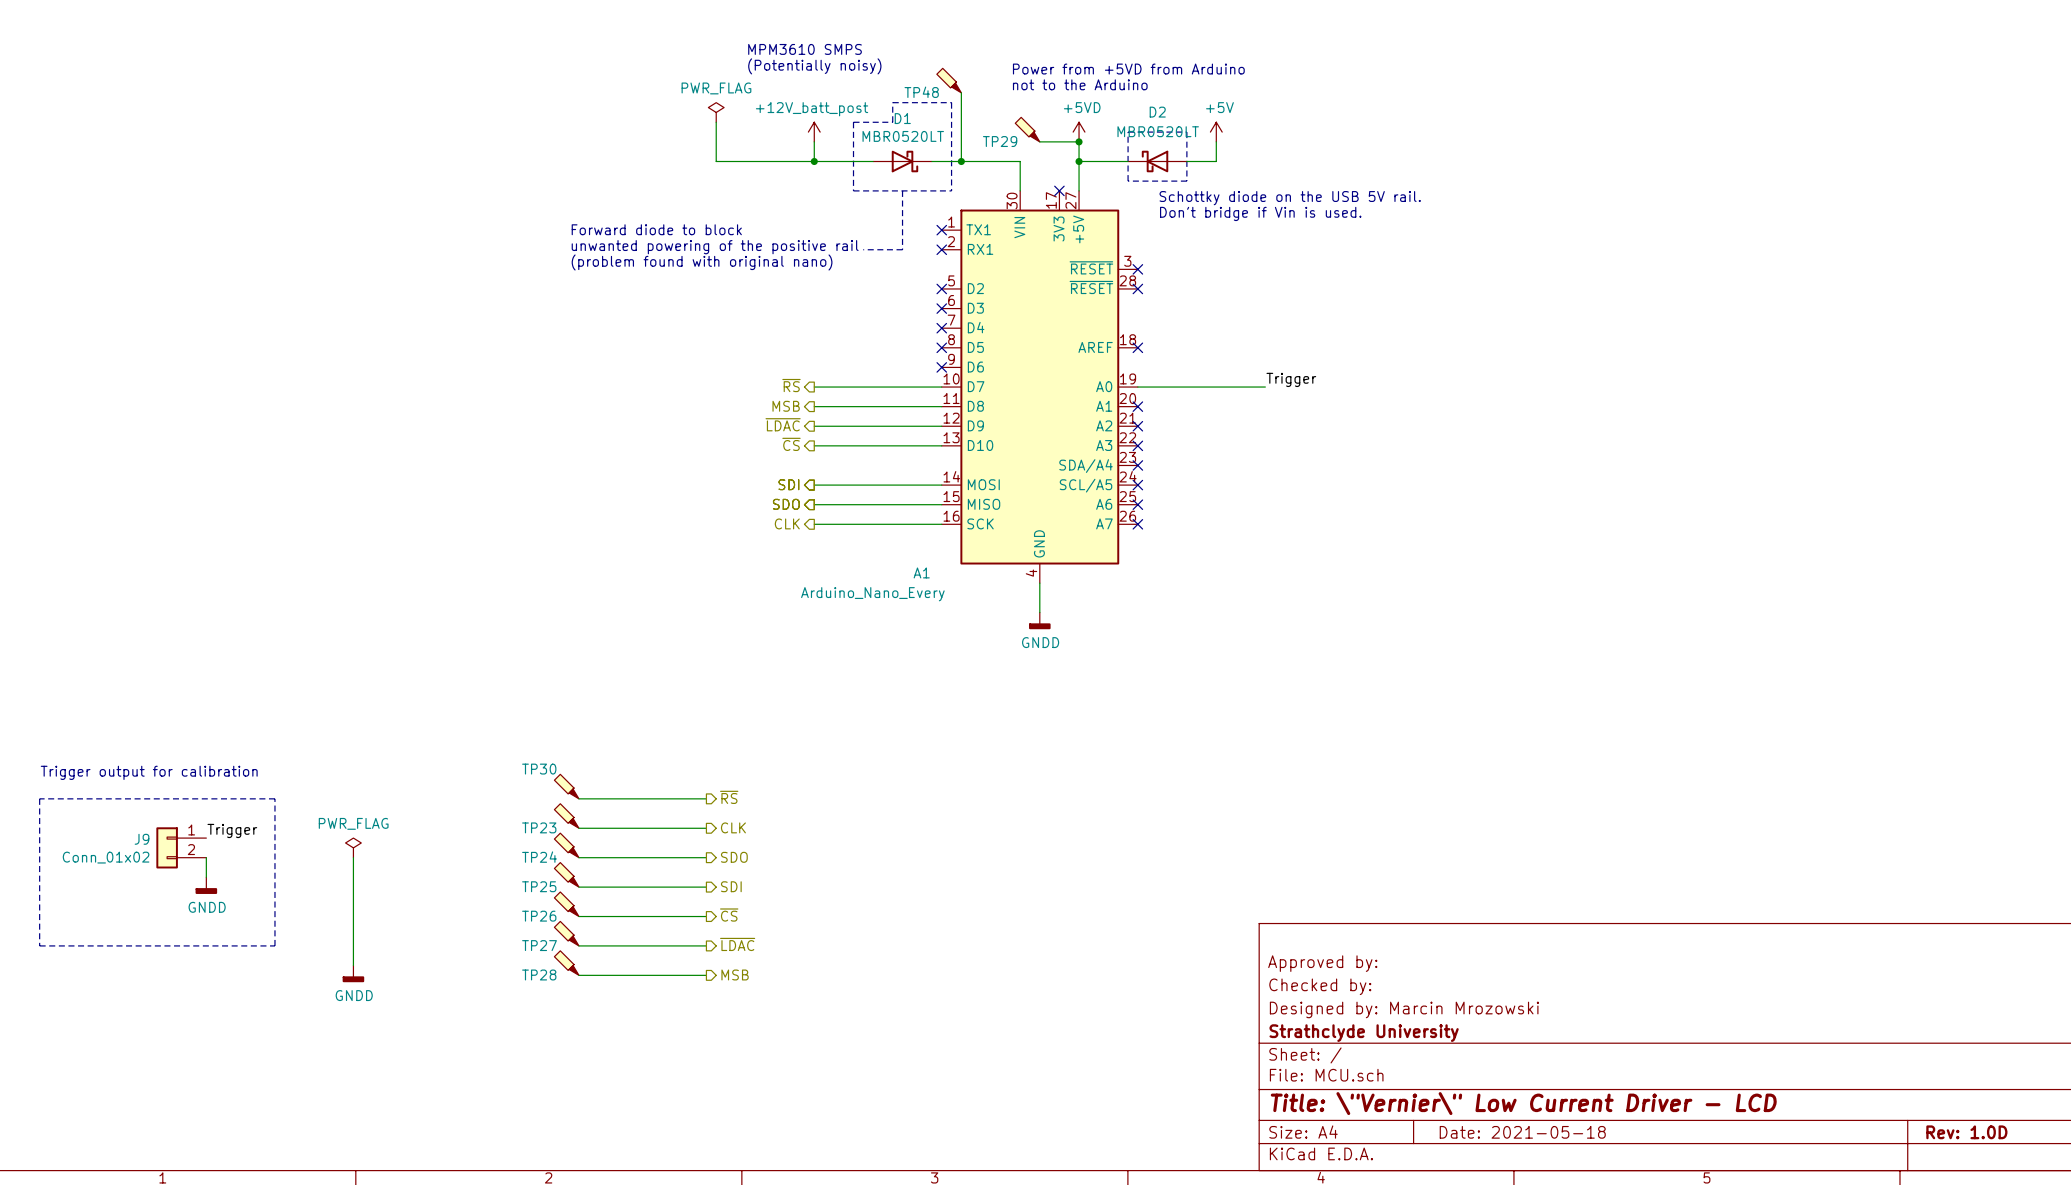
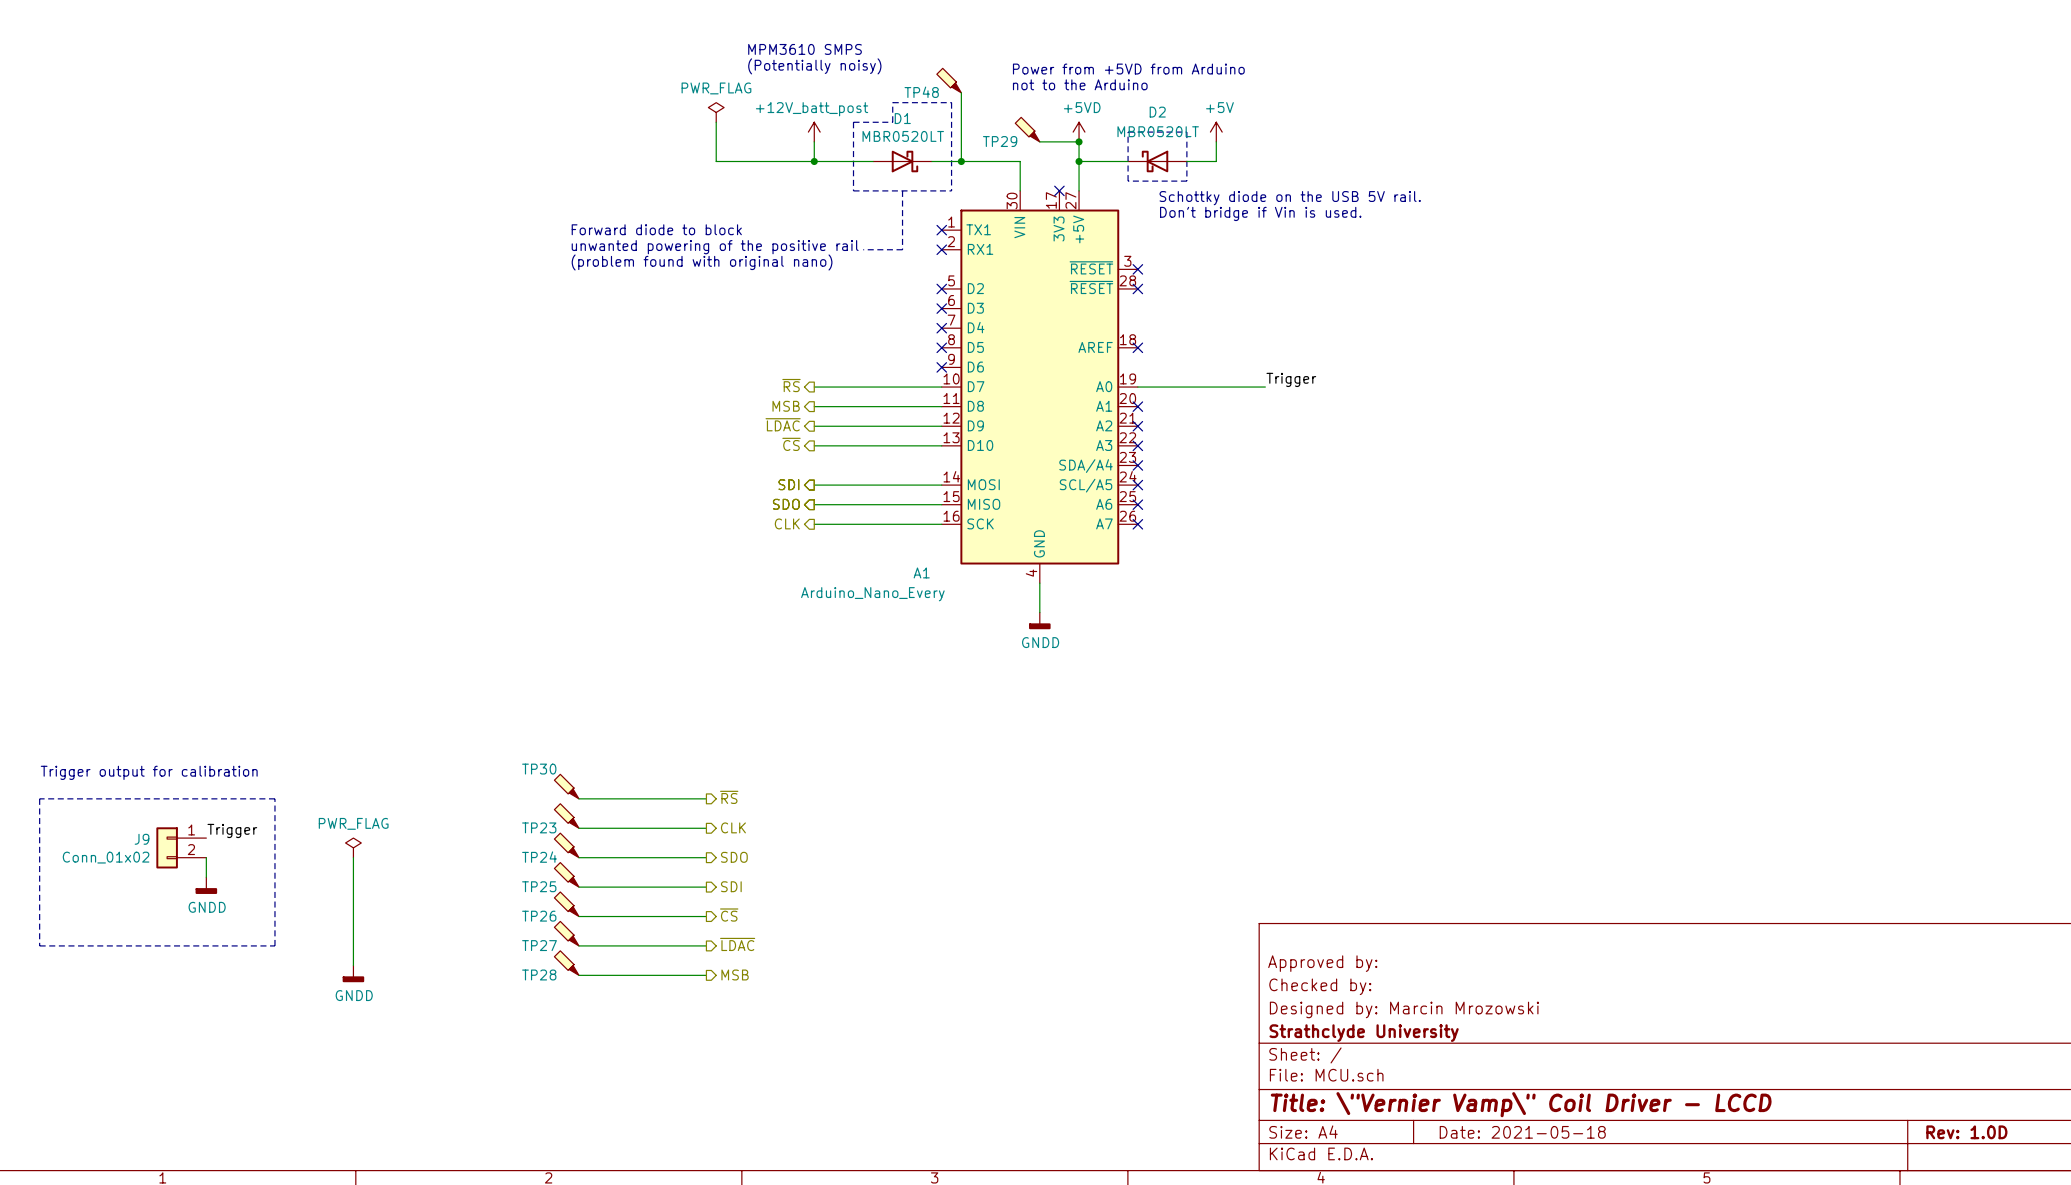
title block: Title: \"Vernier\" Low Current Driver - LCD (1523, 1103) -> Title: \"Vernier Vamp\" Coil Driver - LCCD (1521, 1104)

